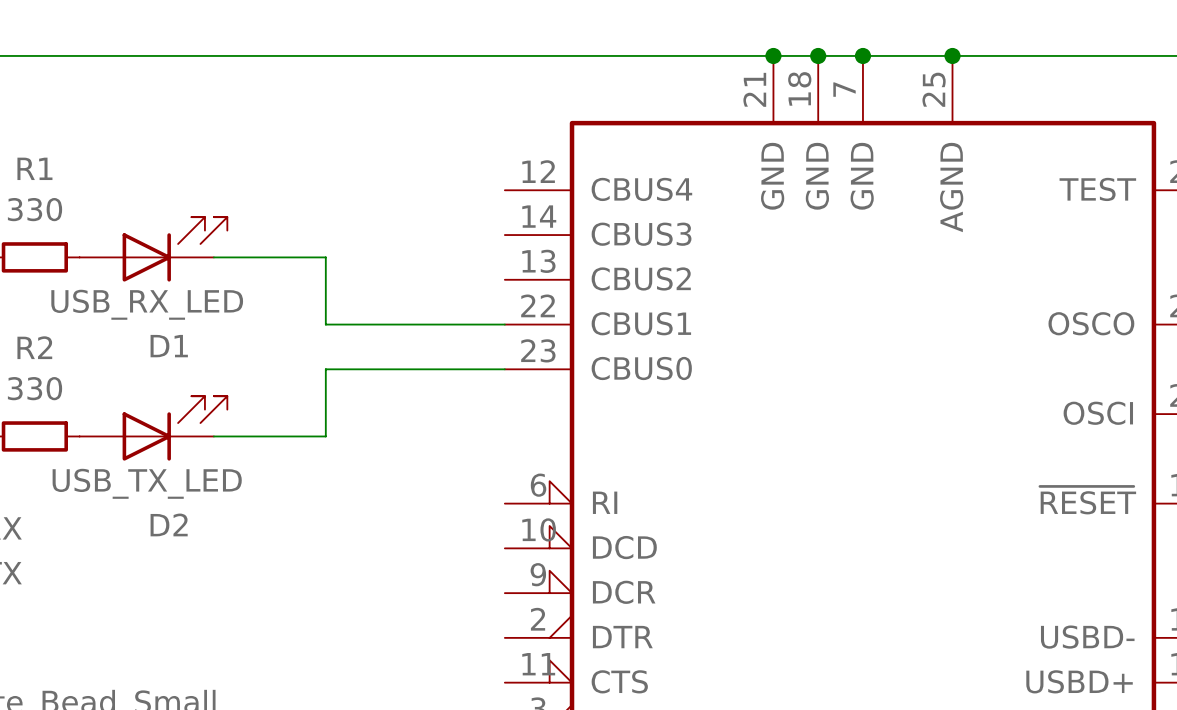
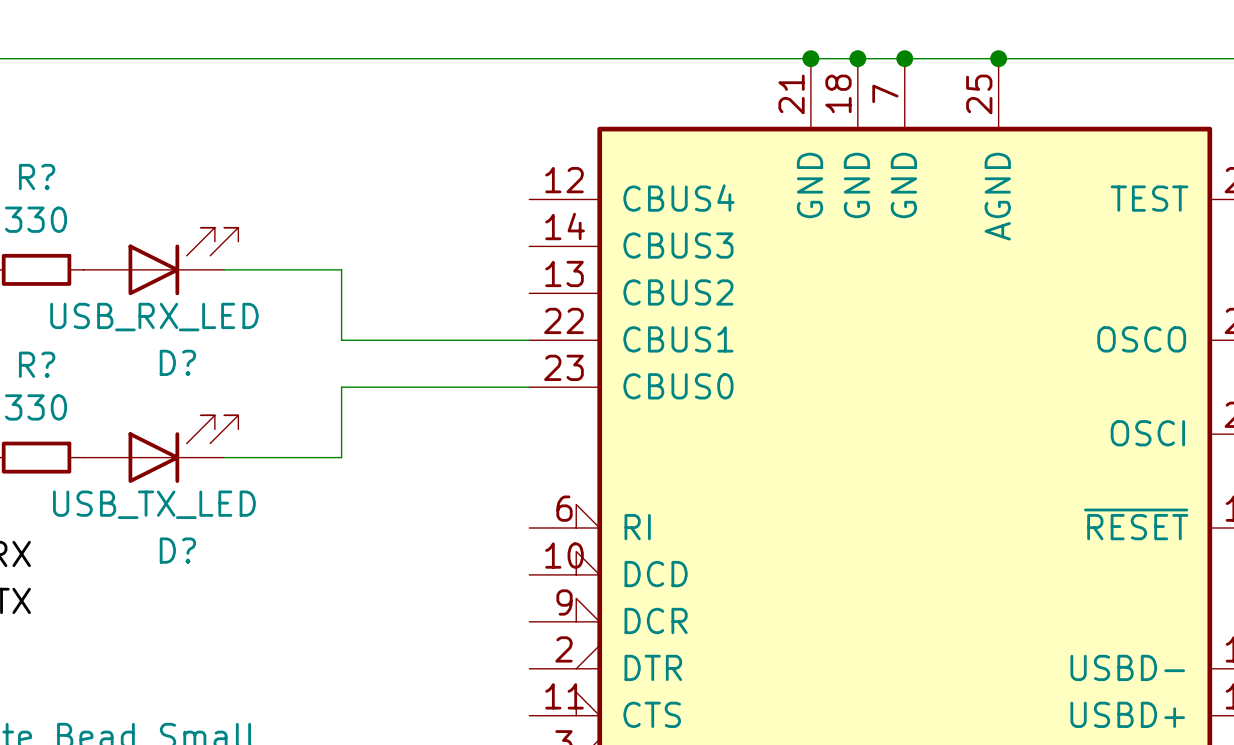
R1 name: R1 (34, 168) -> R? (37, 177)
D1 name: D1 (169, 346) -> D? (177, 362)
R2 name: R2 (34, 347) -> R? (37, 364)
D2 name: D2 (169, 524) -> D? (177, 550)

